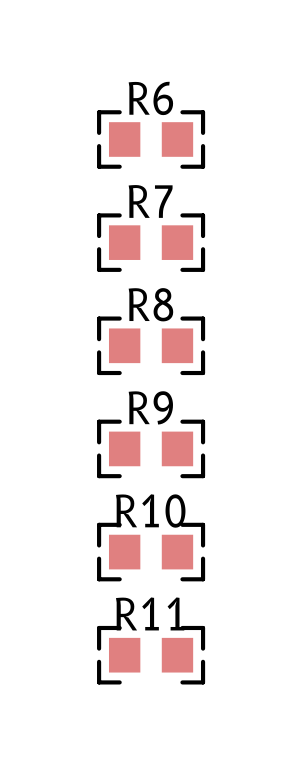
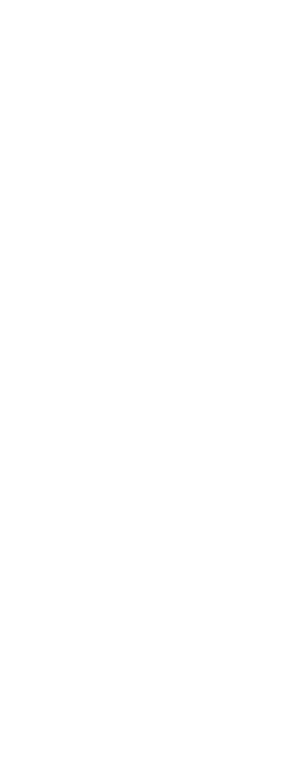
R6: (151, 139) -> none
R7: (151, 242) -> none
R8: (151, 345) -> none
R9: (151, 448) -> none
R10: (151, 552) -> none
R11: (151, 655) -> none

